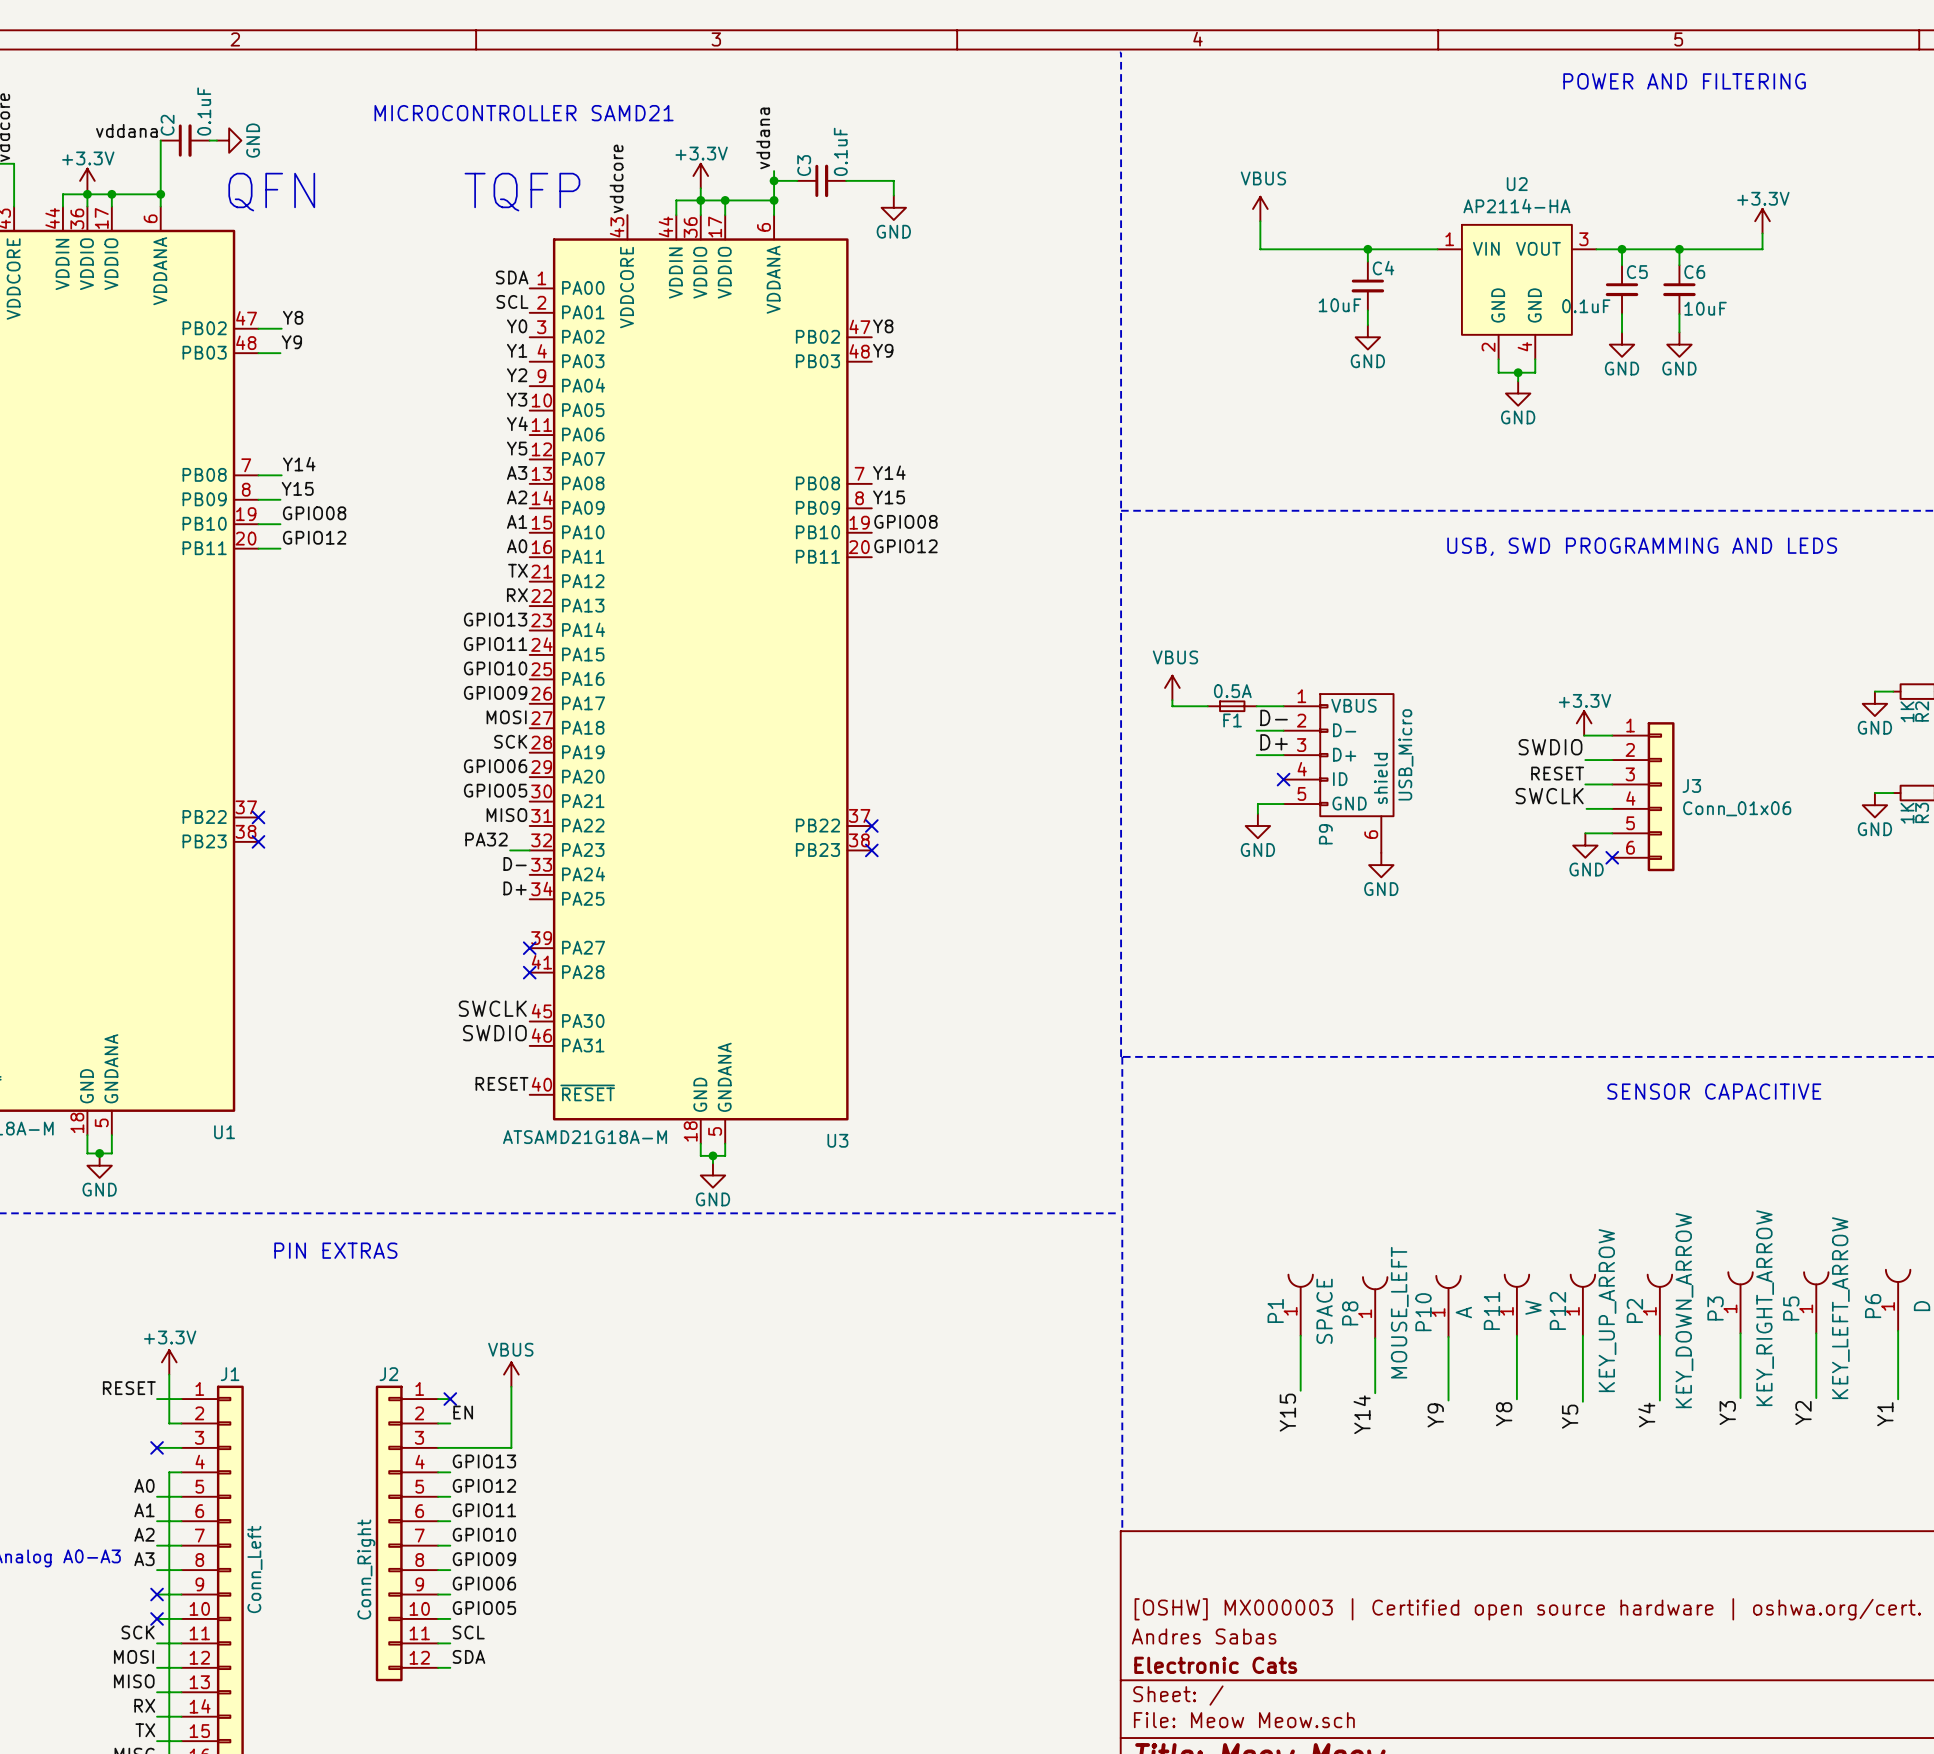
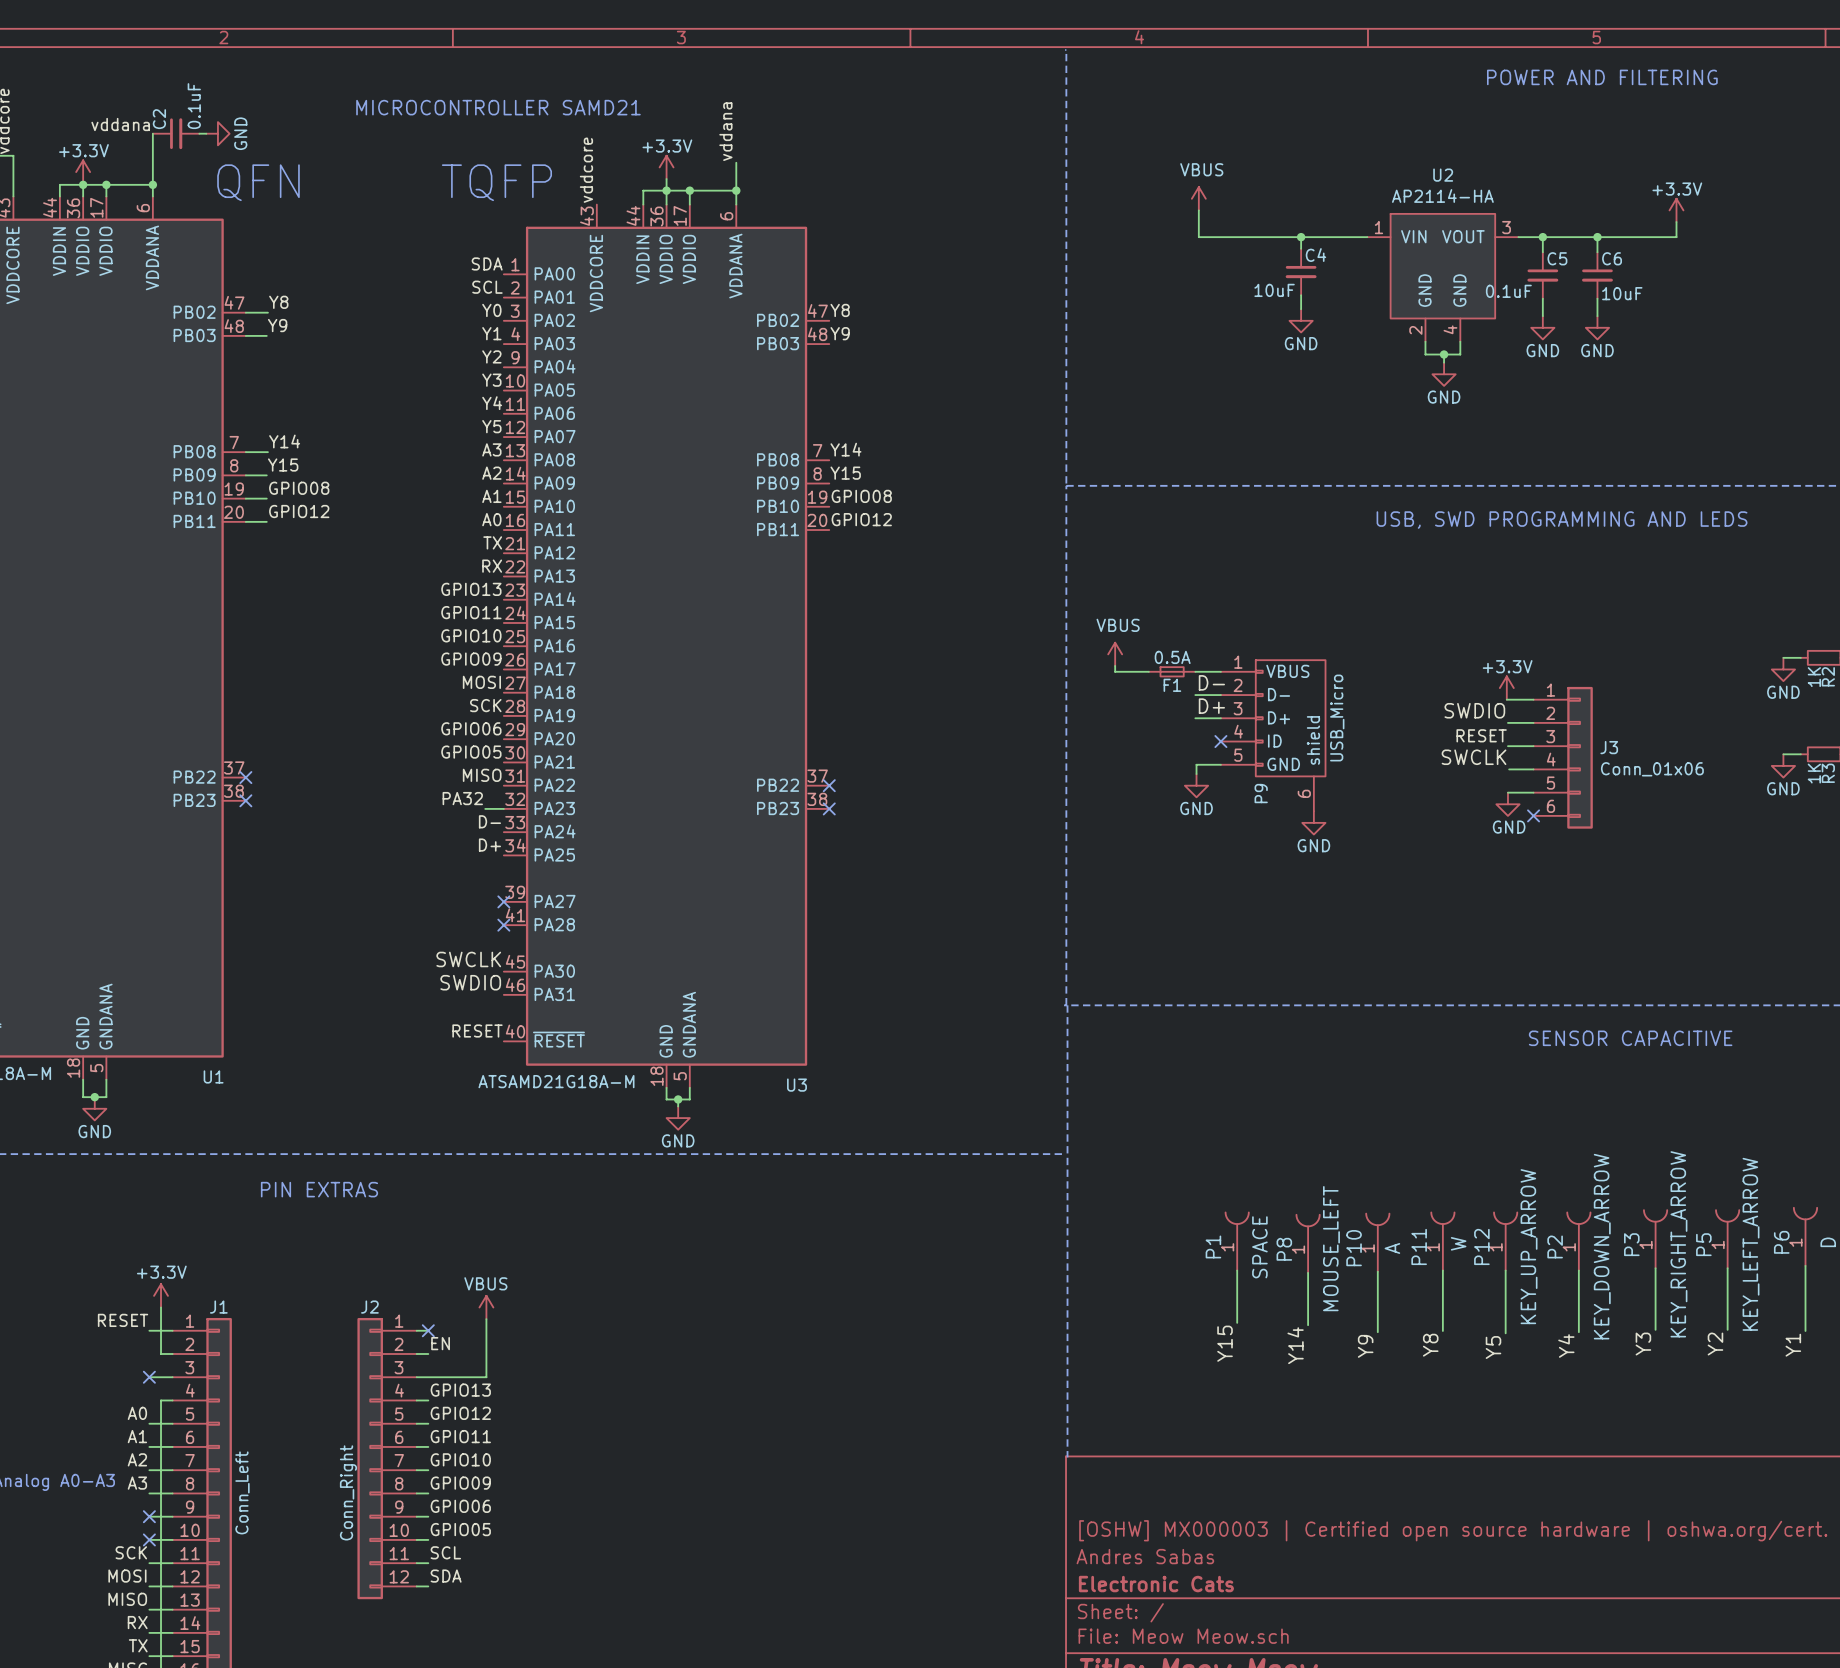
wire: (774, 180) (797, 180) -> none
junction: (774, 180) -> none
C3: 0.1uF (821, 180) -> none
wire: (846, 180) (893, 180) (893, 195) -> none
power symbol: GND (893, 207) -> none

